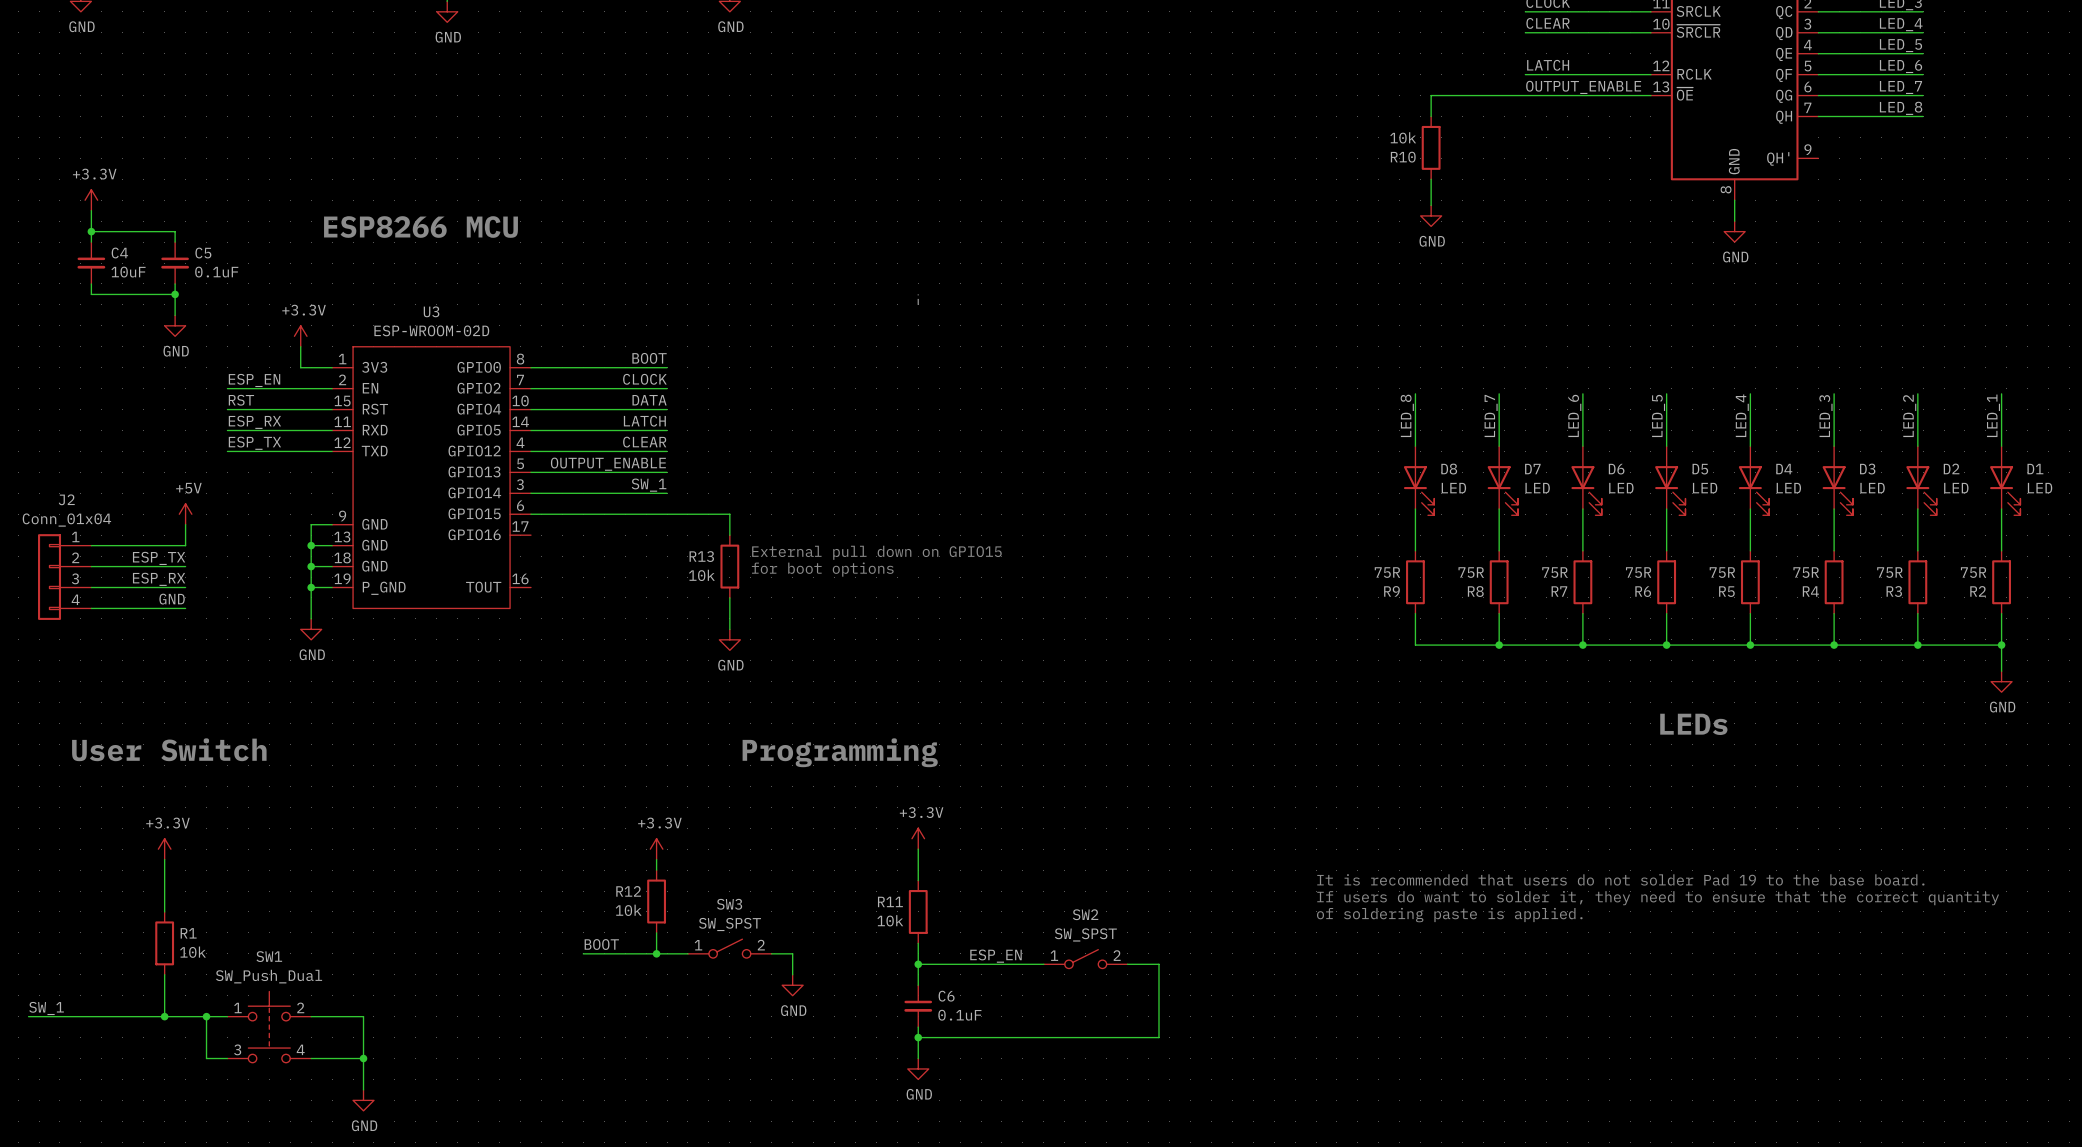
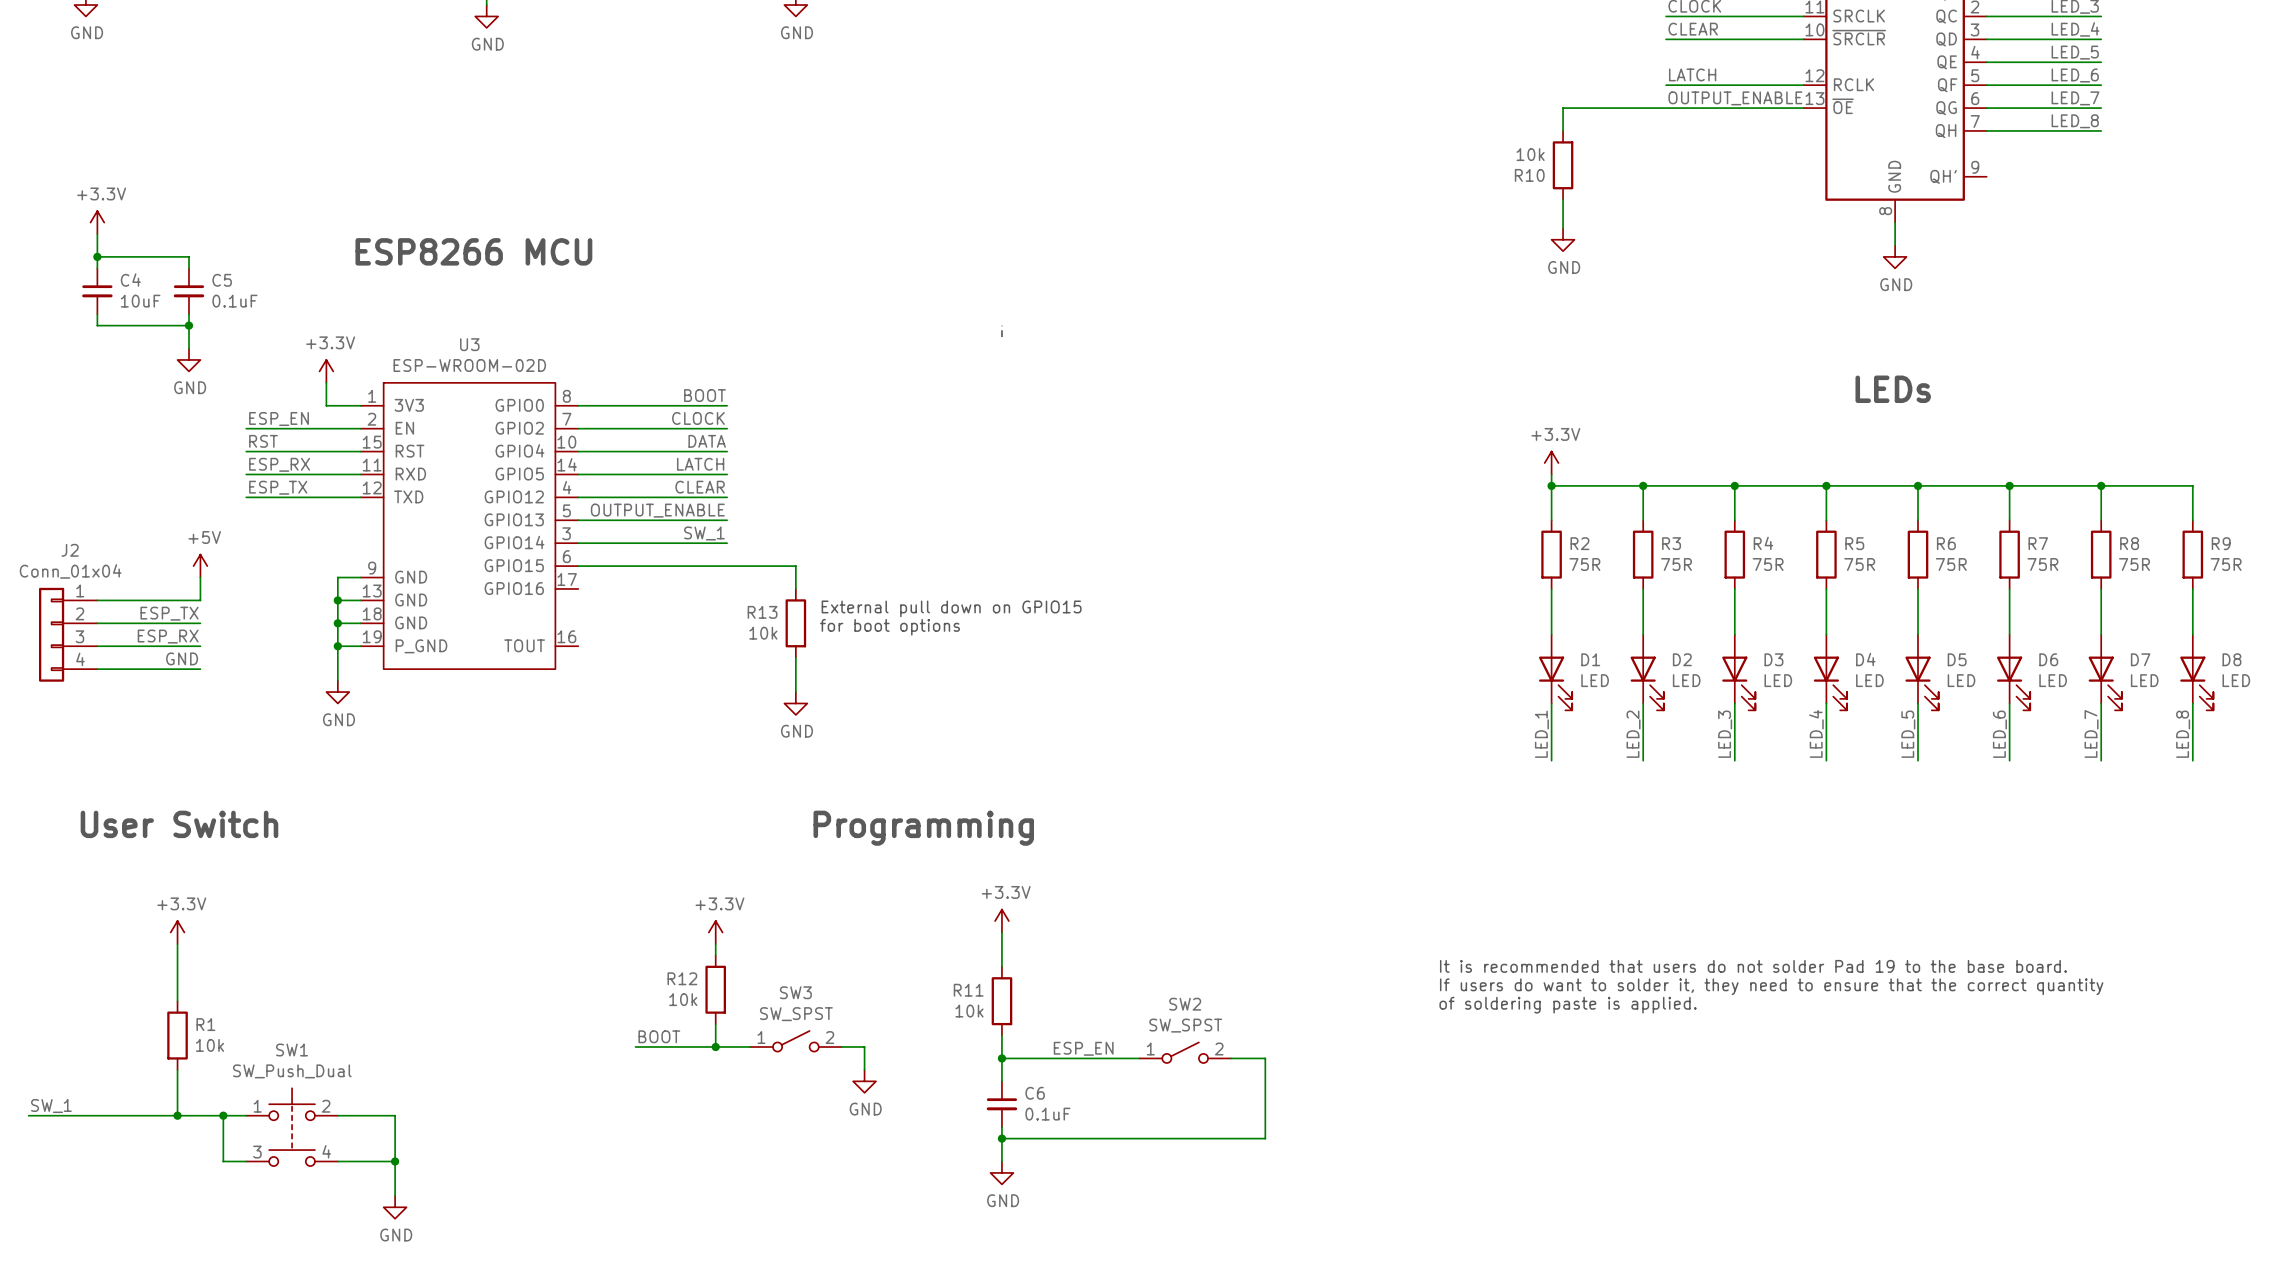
text: none -> LEDs (1893, 389)
wire: (1415, 393) (1415, 446) -> none
wire: (1499, 393) (1499, 446) -> none
wire: (1582, 393) (1582, 446) -> none
wire: (1666, 393) (1666, 446) -> none
wire: (1750, 393) (1750, 446) -> none
wire: (1834, 393) (1834, 446) -> none
wire: (1917, 393) (1917, 446) -> none
wire: (2001, 393) (2001, 446) -> none
label: LED_8 (1407, 415) -> none
label: LED_7 (1491, 415) -> none
label: LED_6 (1574, 415) -> none
label: LED_5 (1658, 415) -> none
label: LED_4 (1742, 415) -> none
label: LED_2 (1909, 415) -> none
label: LED_1 (1993, 415) -> none
label: LED_3 (1825, 416) -> none
power symbol: none -> +3.3V (1551, 463)
wire: none -> (1551, 474) (1551, 520)
wire: none -> (1551, 485) (2192, 485) (2192, 520)
junction: none -> (1551, 485)
junction: none -> (1643, 485)
junction: none -> (1734, 485)
junction: none -> (1826, 485)
junction: none -> (1918, 485)
junction: none -> (2009, 485)
junction: none -> (2101, 485)
D8 position: (1419, 480) -> (2196, 672)
D7 position: (1502, 480) -> (2105, 672)
D6 position: (1586, 480) -> (2013, 672)
D5 position: (1670, 480) -> (1922, 672)
D4 position: (1754, 480) -> (1830, 672)
D3 position: (1837, 480) -> (1738, 672)
D2 position: (1921, 480) -> (1647, 672)
D1 position: (2005, 480) -> (1555, 672)
wire: (1415, 509) (1415, 550) -> (1551, 588) (1551, 634)
wire: (1499, 509) (1499, 550) -> (1643, 588) (1643, 634)
wire: (1582, 509) (1582, 550) -> (1734, 588) (1734, 634)
wire: (1666, 509) (1666, 550) -> (1826, 588) (1826, 634)
wire: (1750, 509) (1750, 550) -> (1918, 588) (1918, 634)
wire: (1834, 509) (1834, 550) -> (2009, 588) (2009, 634)
wire: (1917, 509) (1917, 550) -> (2101, 588) (2101, 634)
wire: (2001, 509) (2001, 550) -> (2192, 588) (2192, 634)
R9 value position: 75R (1387, 572) -> 75R (2226, 564)
R8 value position: 75R (1471, 572) -> 75R (2134, 564)
R7 value position: 75R (1554, 572) -> 75R (2042, 564)
R6 value position: 75R (1638, 572) -> 75R (1951, 564)
R5 value position: 75R (1722, 572) -> 75R (1859, 564)
R4 value position: 75R (1806, 572) -> 75R (1768, 564)
R3 value position: 75R (1889, 572) -> 75R (1676, 564)
R2 value position: 75R (1973, 572) -> 75R (1584, 564)
R9 position: (1415, 582) -> (2192, 554)
R8 position: (1499, 582) -> (2101, 554)
R7 position: (1582, 582) -> (2009, 554)
R6 position: (1666, 582) -> (1918, 554)
R5 position: (1750, 582) -> (1826, 554)
R4 position: (1834, 582) -> (1734, 554)
R3 position: (1917, 582) -> (1643, 554)
R2 position: (2001, 582) -> (1551, 554)
R9 name position: R9 (1391, 591) -> R9 (2221, 543)
R8 name position: R8 (1475, 591) -> R8 (2129, 543)
R7 name position: R7 (1559, 591) -> R7 (2038, 543)
R6 name position: R6 (1643, 591) -> R6 (1946, 543)
R5 name position: R5 (1726, 591) -> R5 (1854, 543)
R4 name position: R4 (1810, 591) -> R4 (1763, 543)
R3 name position: R3 (1894, 591) -> R3 (1671, 543)
R2 name position: R2 (1978, 591) -> R2 (1579, 543)
wire: (1415, 613) (1415, 645) (2001, 645) -> none
wire: (1499, 613) (1499, 645) -> (1643, 485) (1643, 520)
wire: (1582, 613) (1582, 645) -> (1734, 485) (1734, 520)
wire: (1666, 613) (1666, 645) -> (1826, 485) (1826, 520)
wire: (1750, 613) (1750, 645) -> (1918, 485) (1918, 520)
wire: (1834, 613) (1834, 645) -> (2009, 485) (2009, 520)
wire: (1917, 613) (1917, 645) -> (2101, 485) (2101, 520)
wire: (2001, 613) (2001, 671) -> none
wire: none -> (1551, 703) (1551, 760)
wire: none -> (1643, 703) (1643, 760)
wire: none -> (1734, 703) (1734, 760)
wire: none -> (1826, 703) (1826, 760)
wire: none -> (1918, 703) (1918, 760)
wire: none -> (2009, 703) (2009, 760)
wire: none -> (2101, 703) (2101, 760)
wire: none -> (2192, 703) (2192, 760)
junction: (1499, 645) -> none
junction: (1582, 645) -> none
junction: (1666, 645) -> none
junction: (1750, 645) -> none
junction: (1834, 645) -> none
junction: (1917, 645) -> none
junction: (2001, 645) -> none
label: none -> LED_1 (1541, 734)
label: none -> LED_2 (1633, 734)
label: none -> LED_3 (1725, 734)
label: none -> LED_4 (1816, 733)
label: none -> LED_5 (1908, 734)
label: none -> LED_6 (1999, 734)
label: none -> LED_7 (2091, 733)
label: none -> LED_8 (2183, 734)
power symbol: GND (2001, 681) -> none
text: LEDs (1693, 724) -> none

